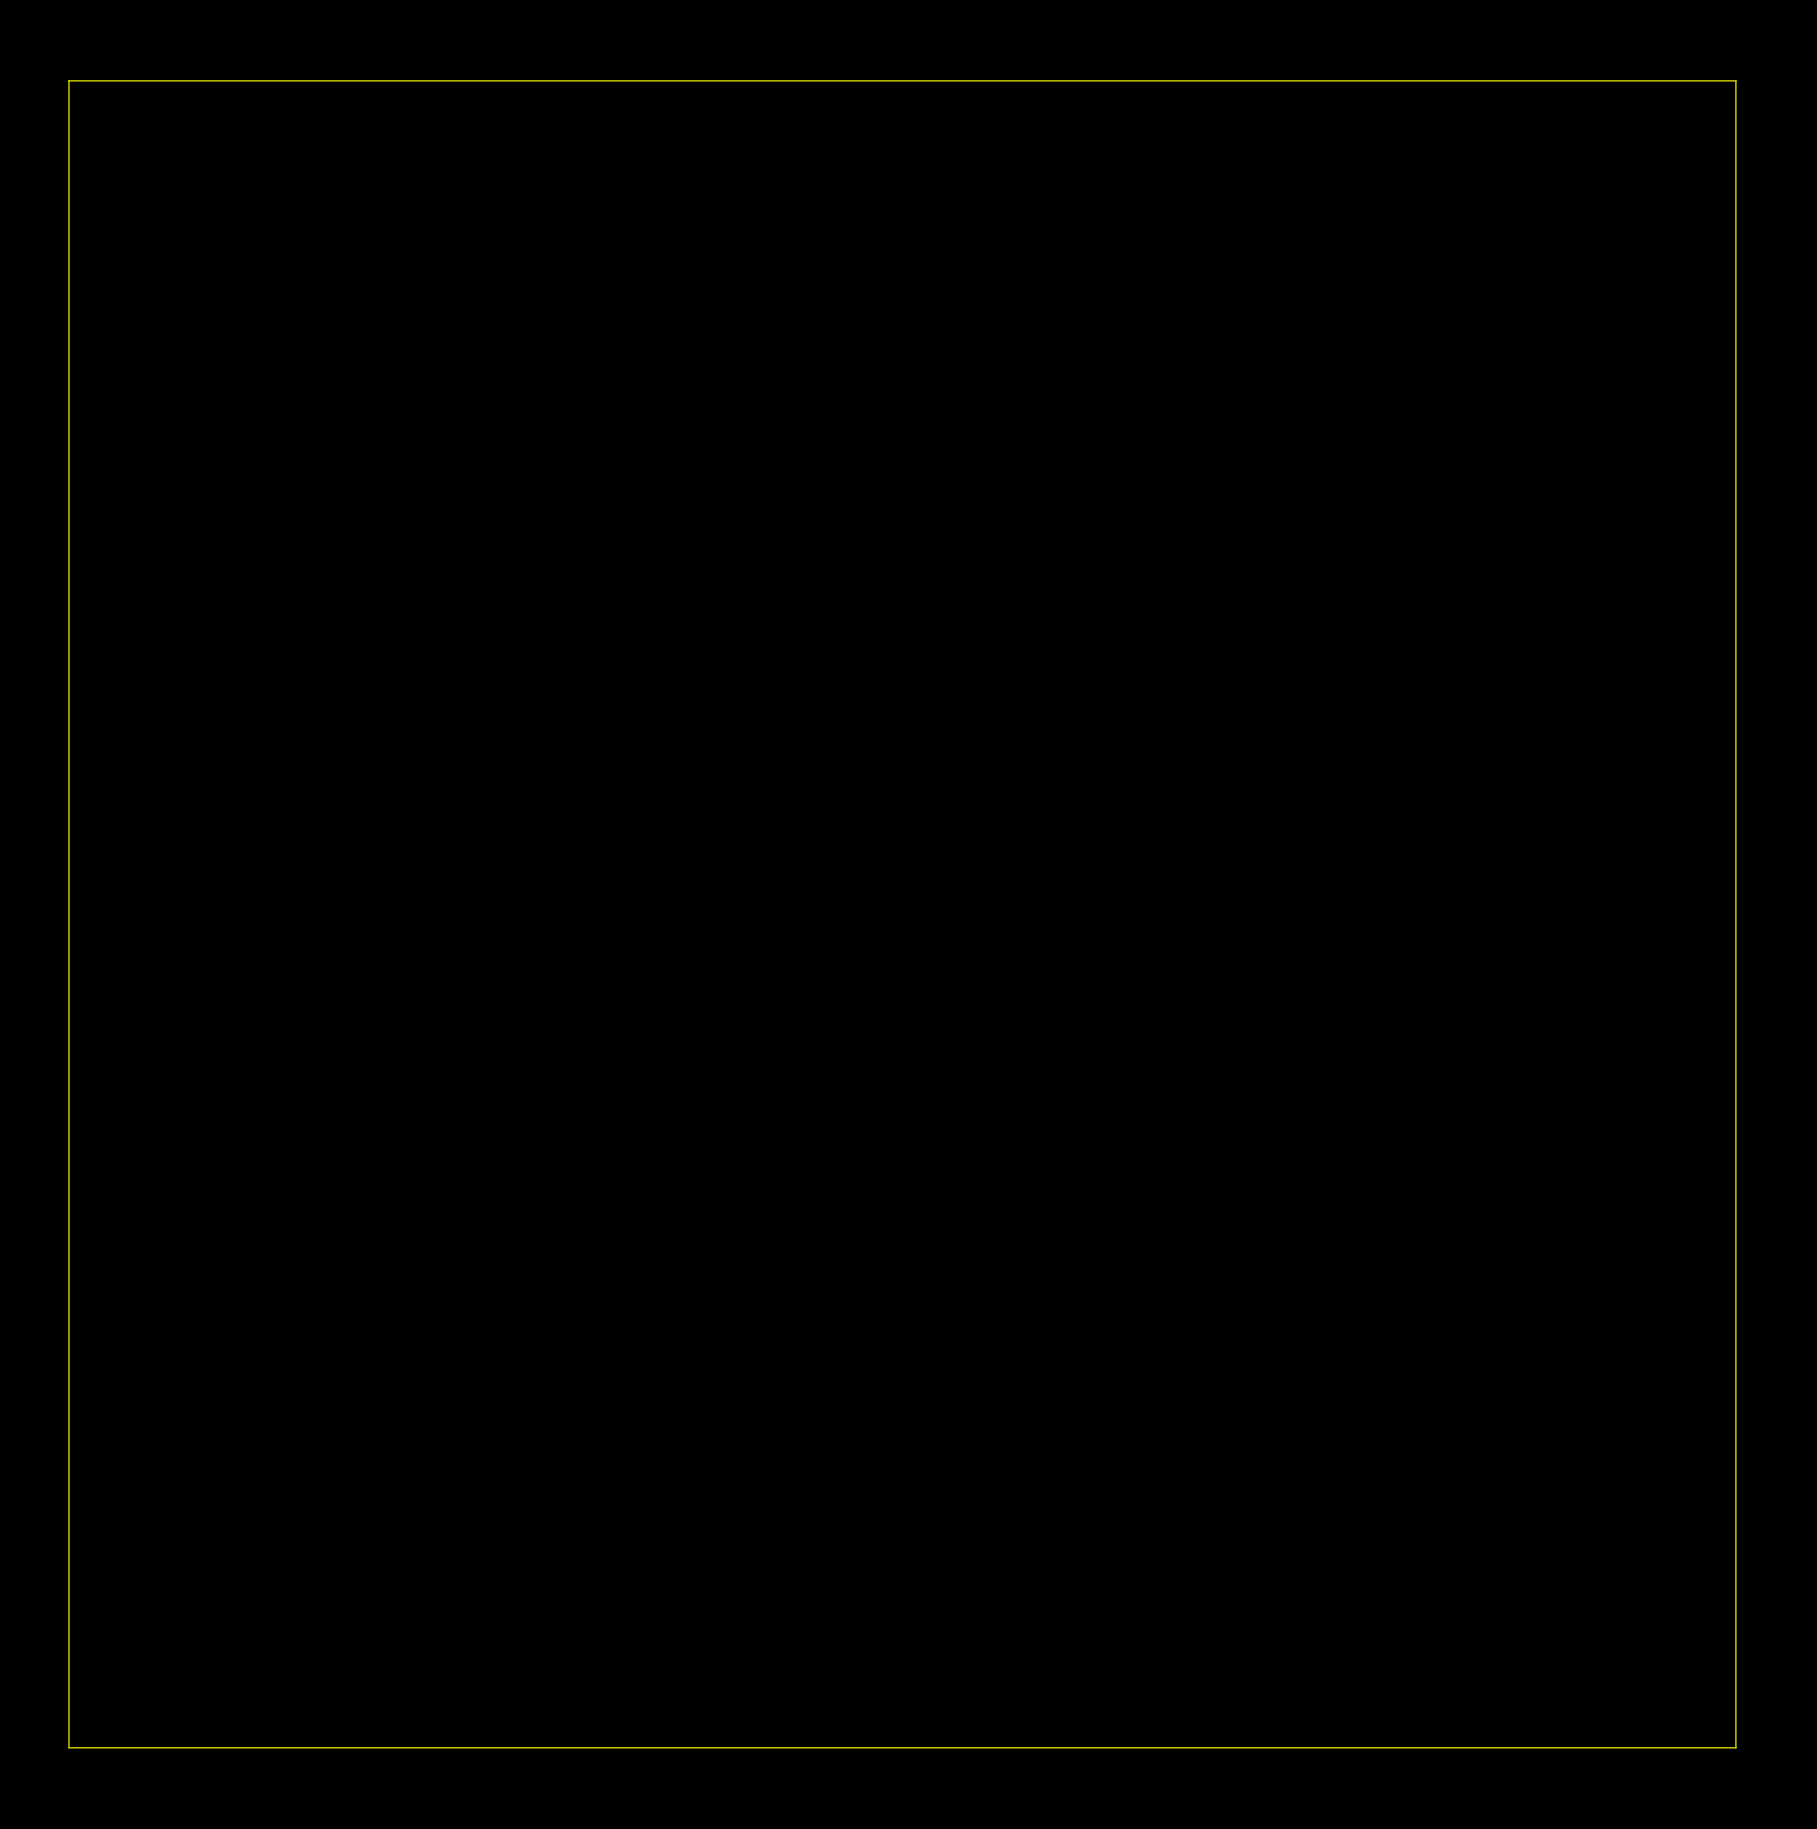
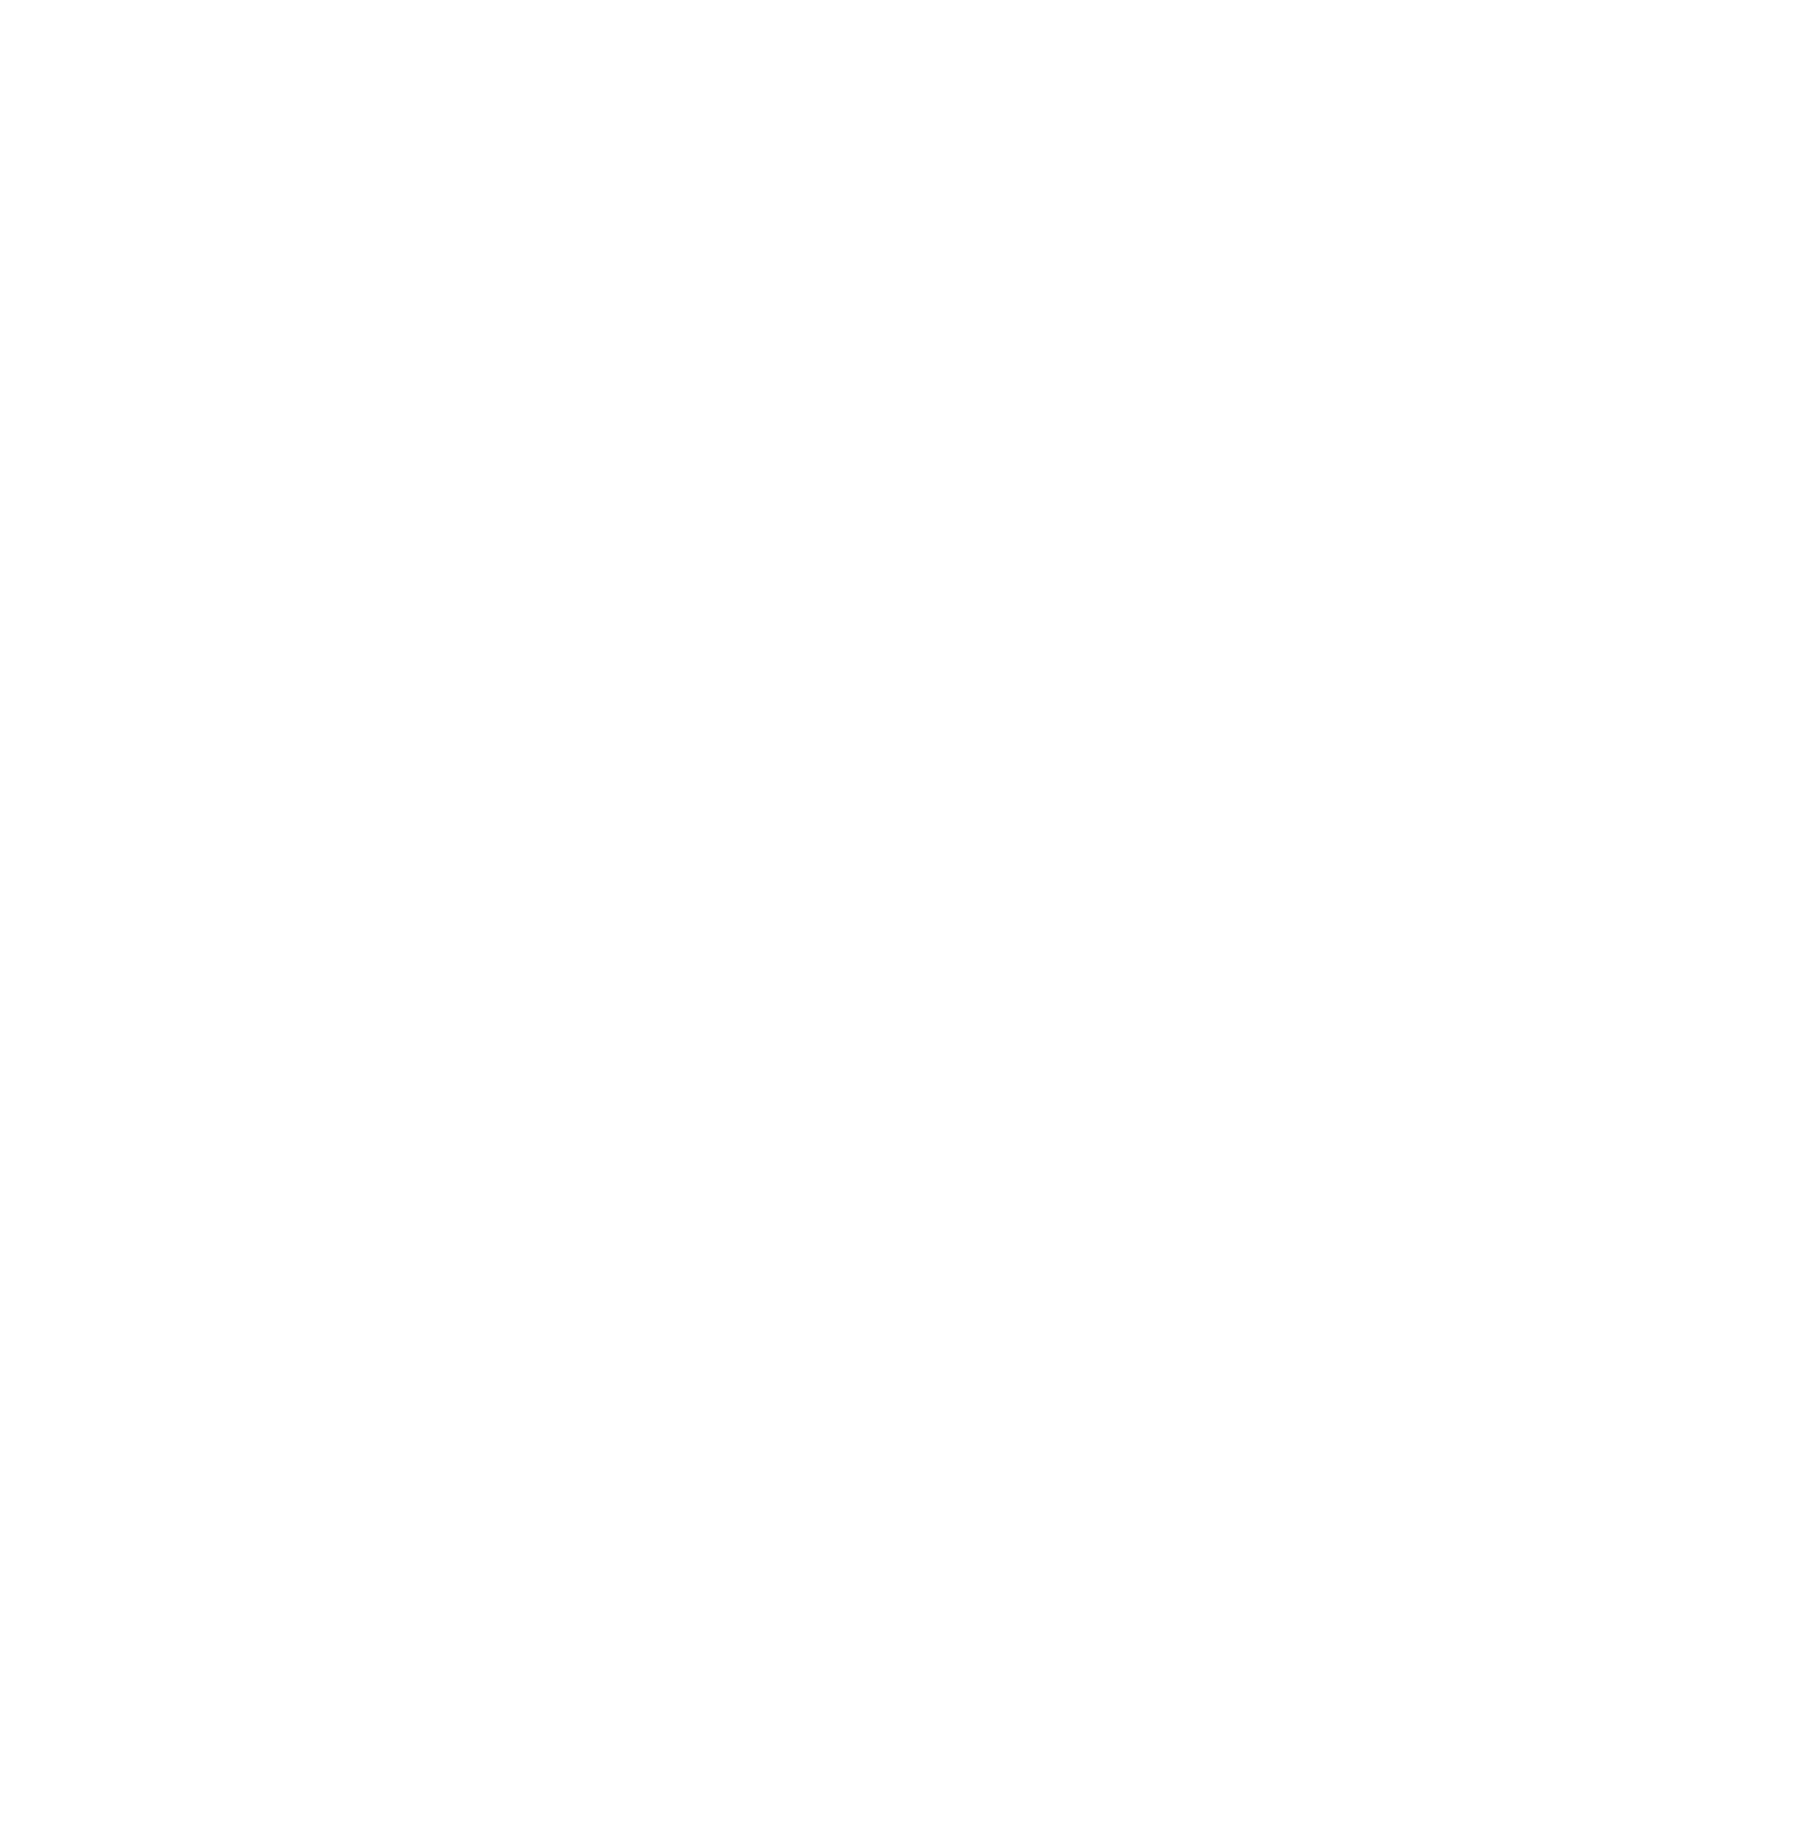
board edge: (1735, 80) (68, 80) (68, 1747) (1735, 1747) (1735, 80) -> none

